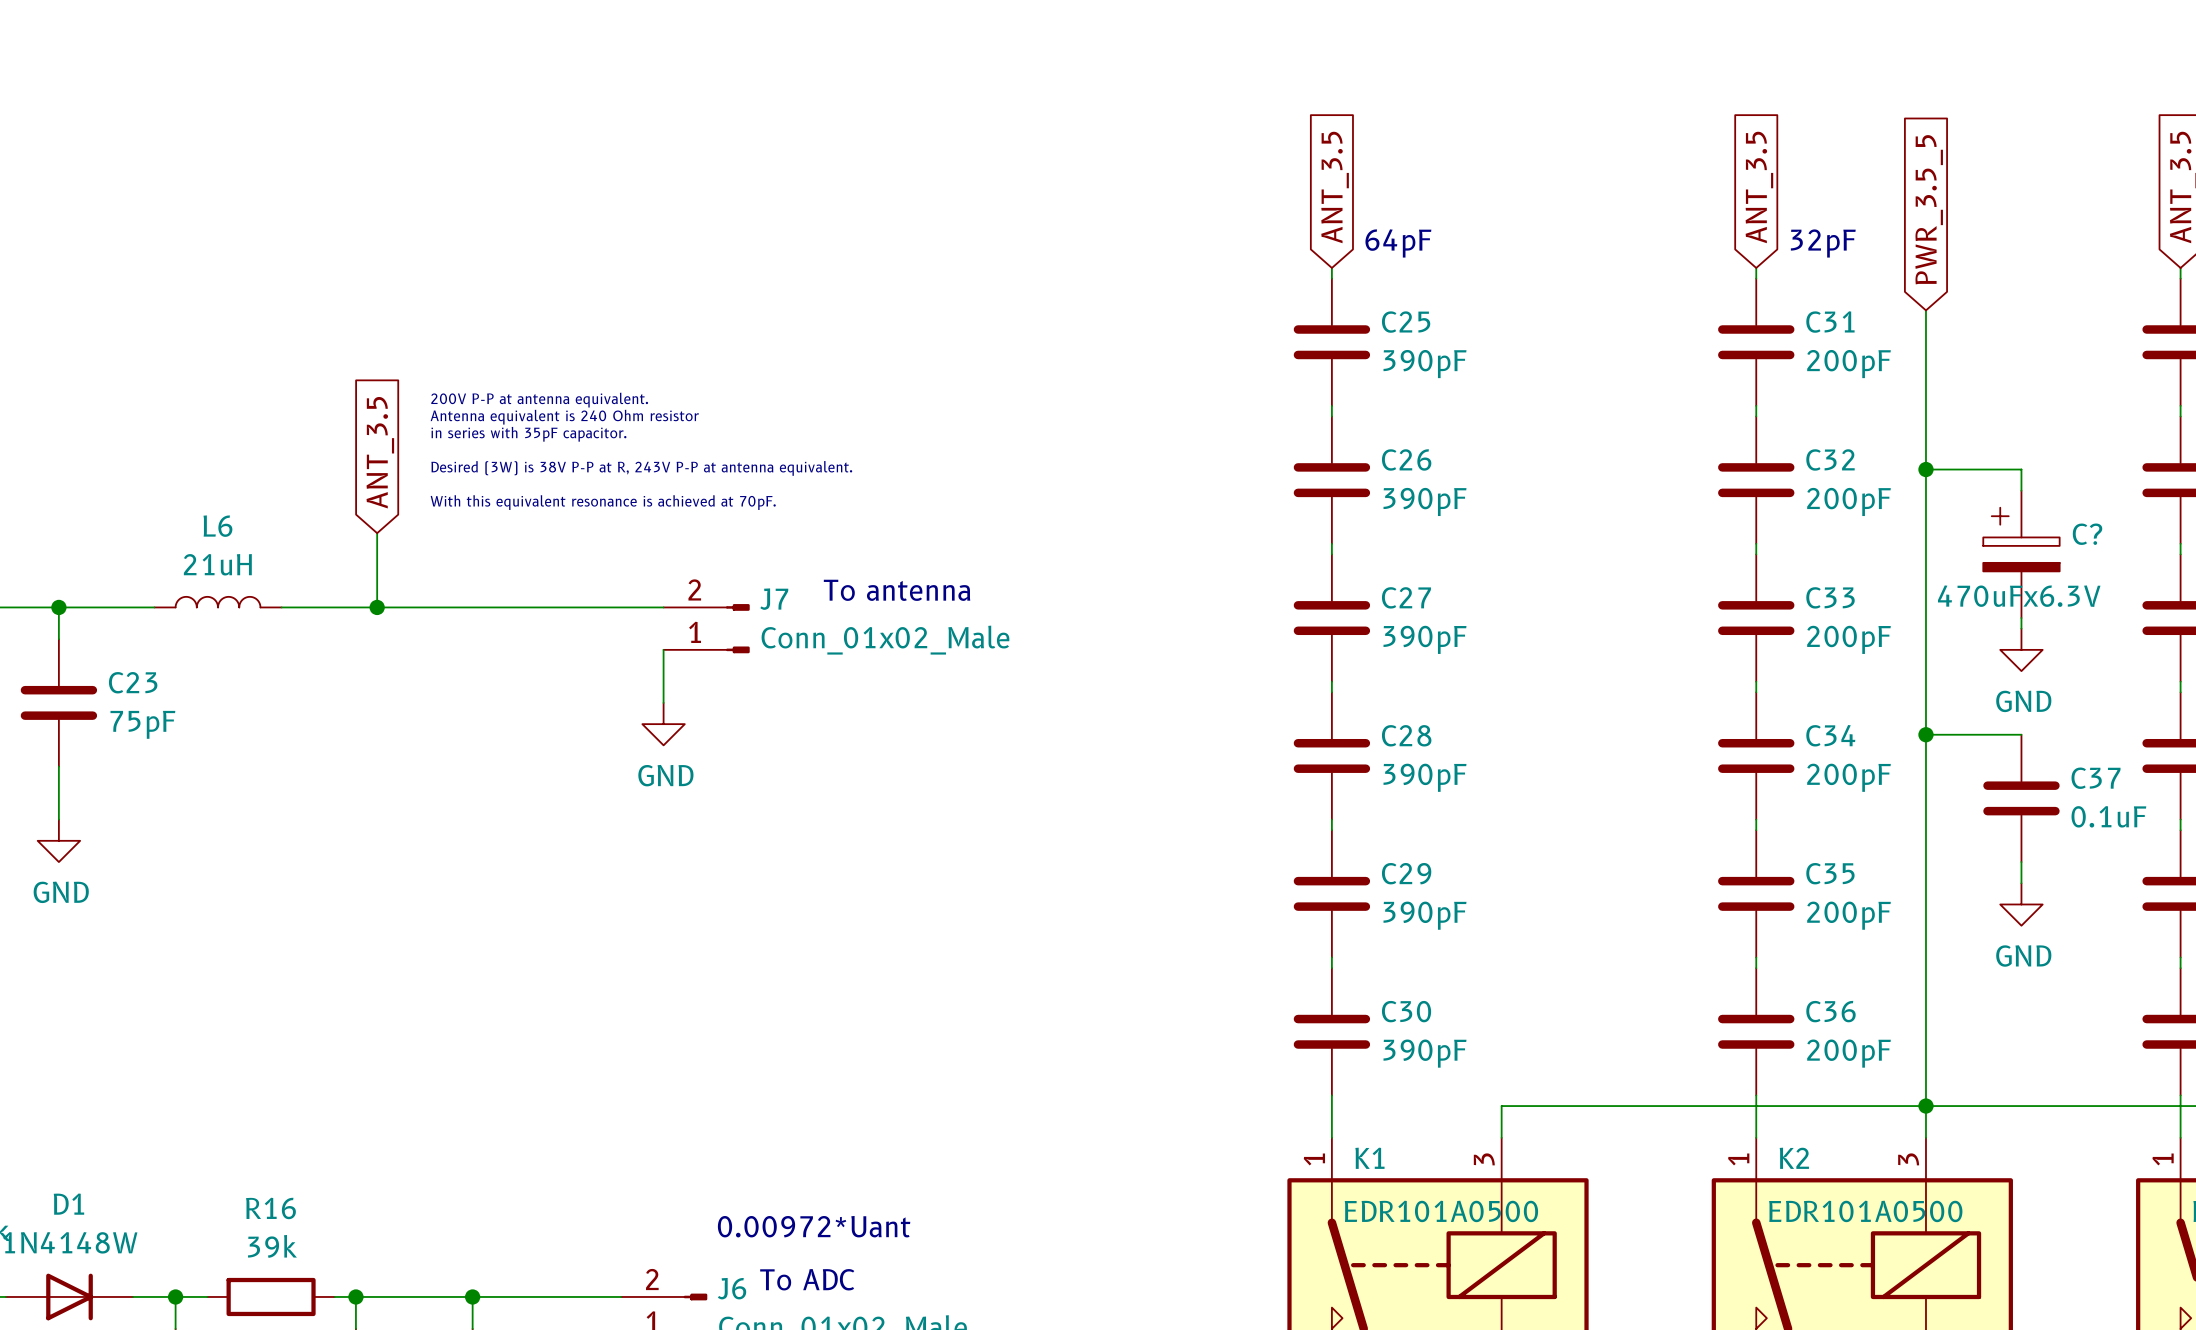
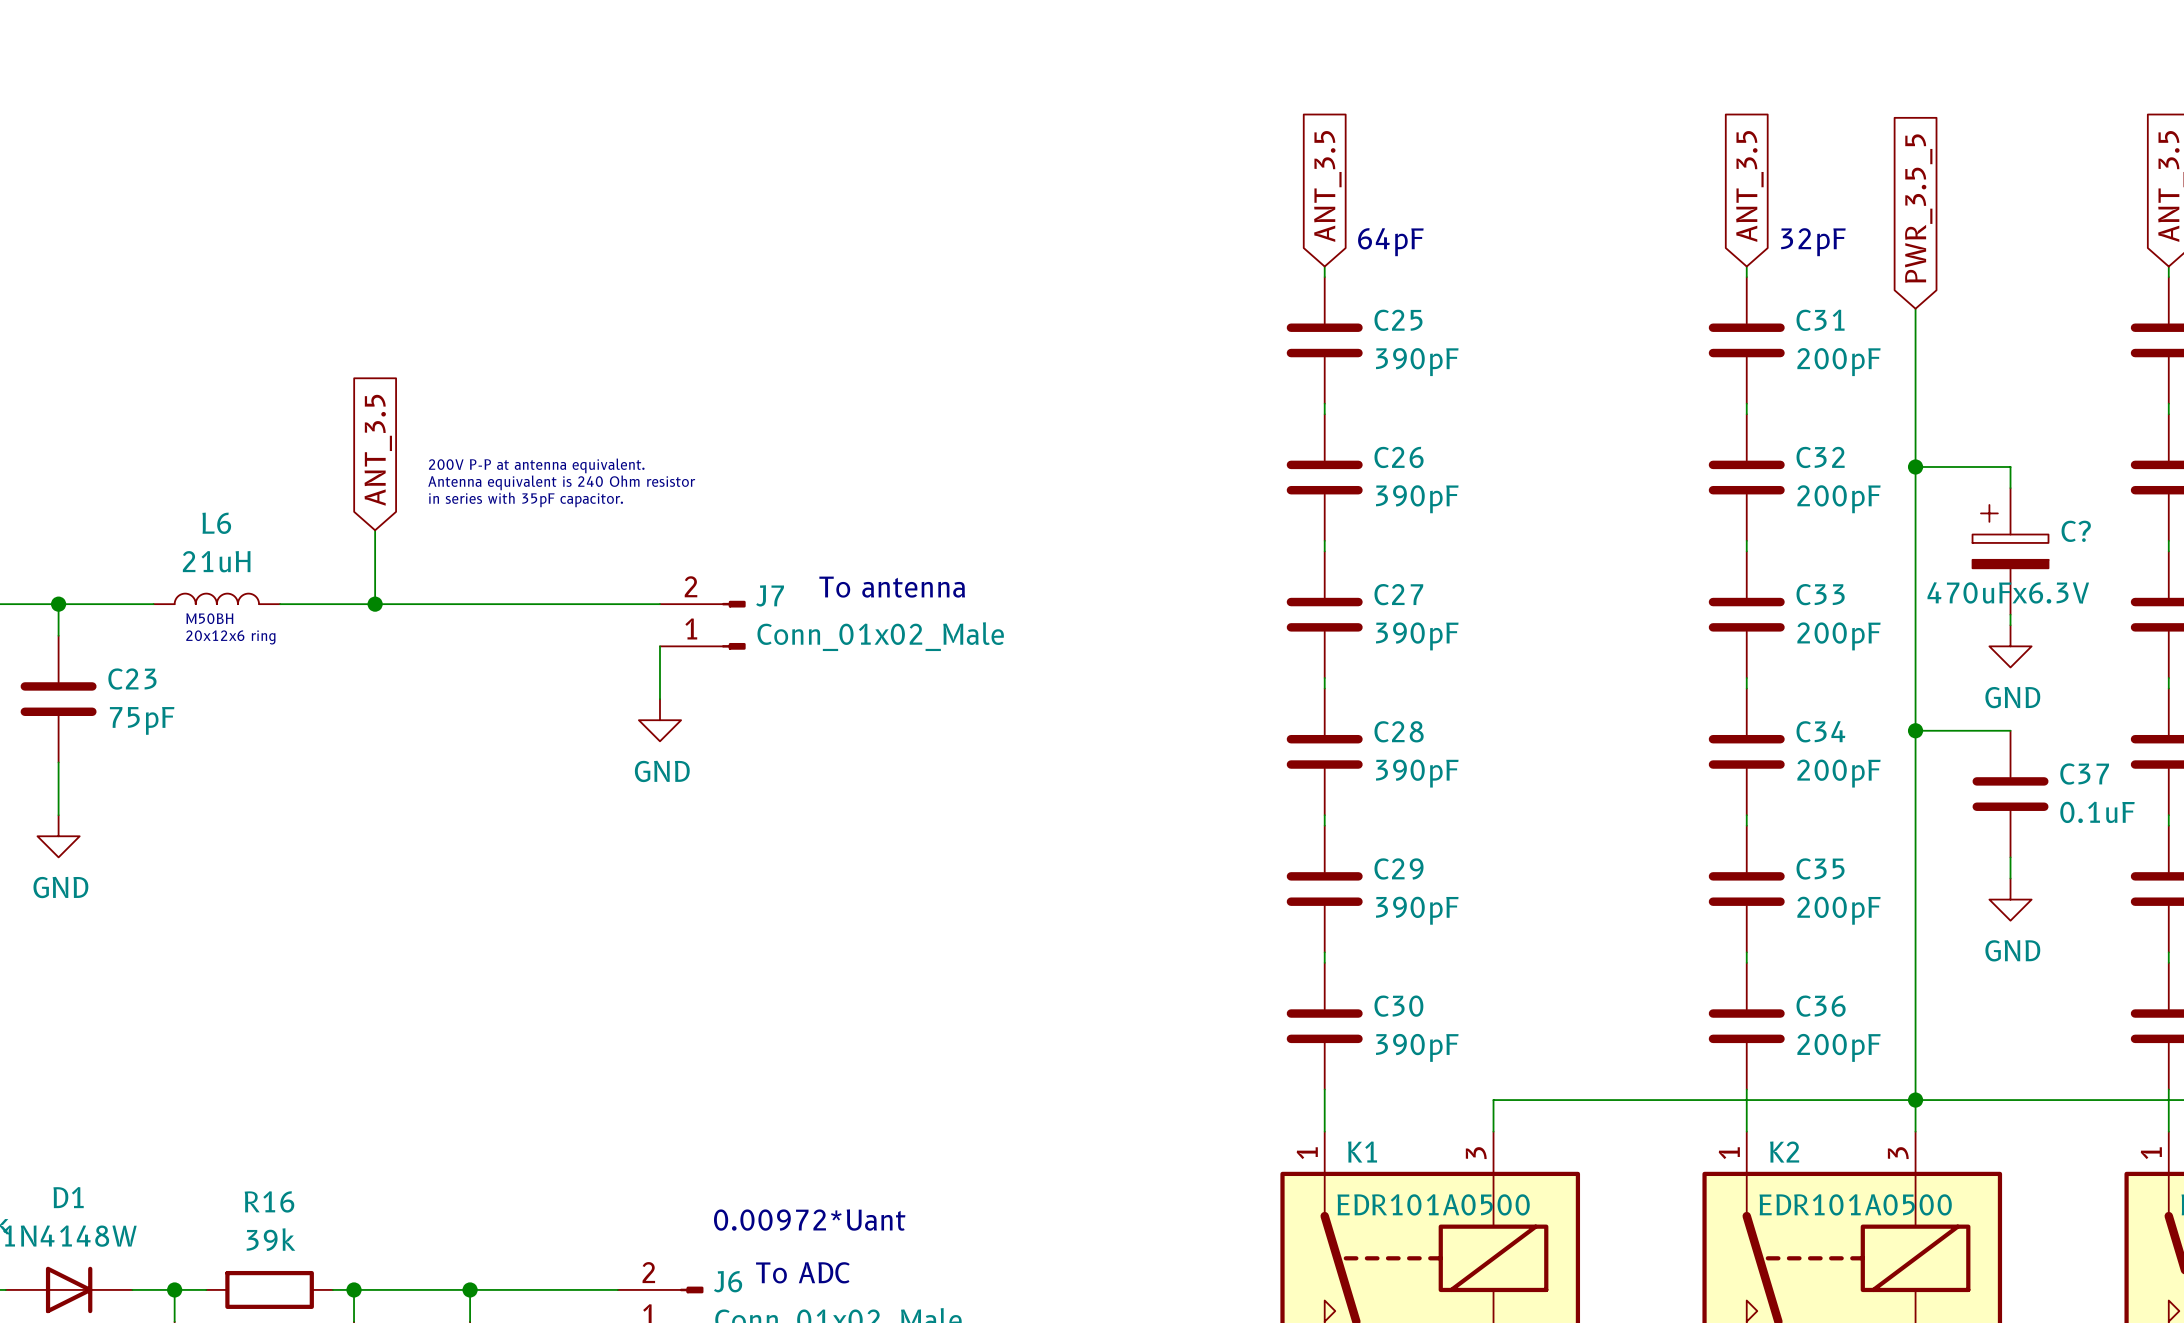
text: 200V P-P at antenna equivalent. (539, 400) -> none
text position: Antenna equivalent is 240 Ohm resistor (564, 417) -> Antenna equivalent is 240 Ohm resistor (561, 482)
text: in series with 35pF capacitor. (528, 434) -> none
text: Desired (3W) is 38V P-P at R, 243V P-P at antenna equivalent. (641, 468) -> 200V P-P at antenna equivalent. (536, 465)
text: With this equivalent resonance is achieved at 70pF. (603, 502) -> in series with 35pF capacitor. (526, 499)
text: none -> M50BH (209, 618)
text: none -> 20x12x6 ring (230, 637)

